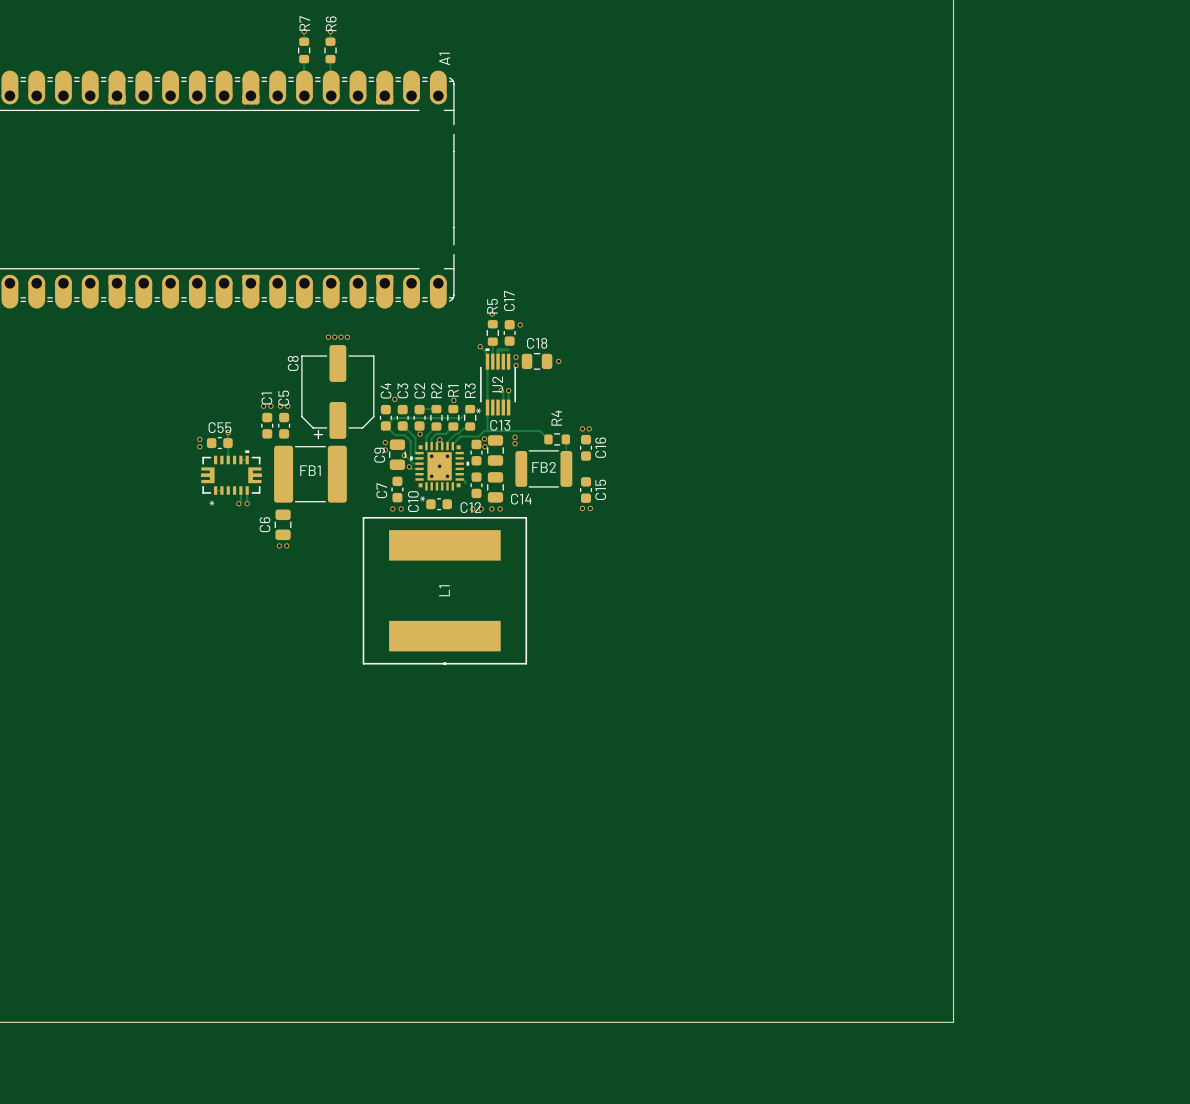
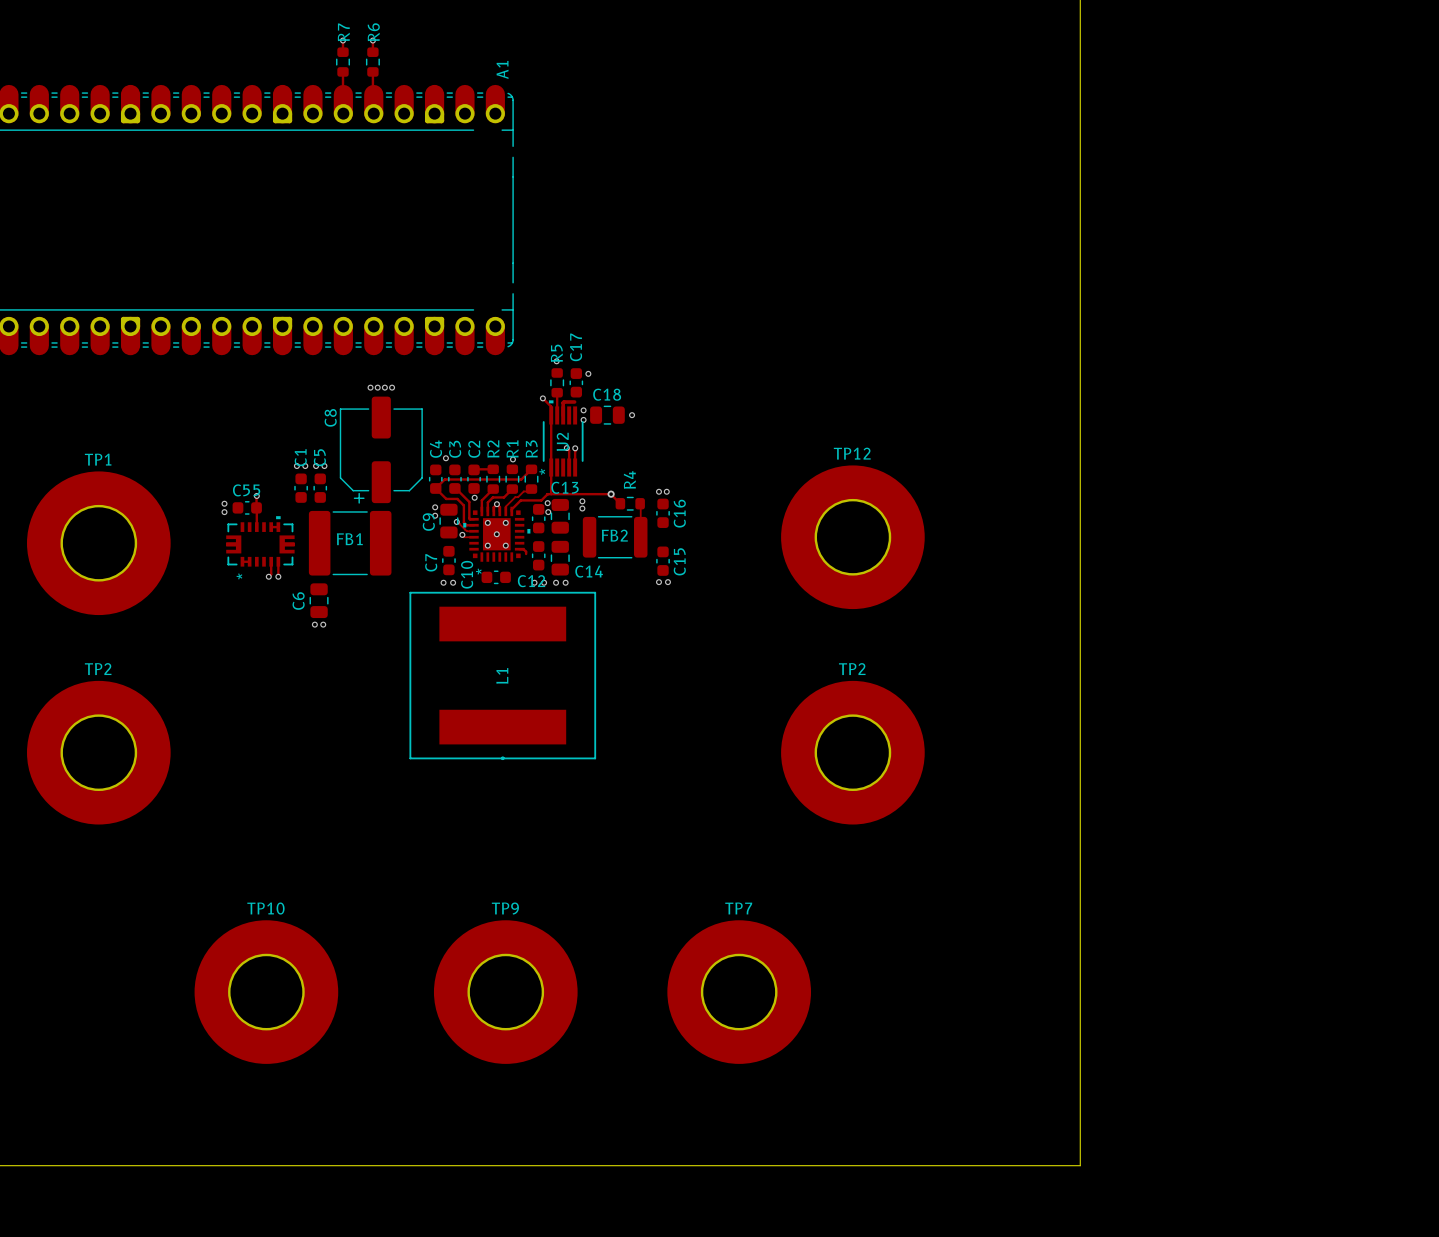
via: none -> (611, 494)
TP12: none -> (852, 537)
TP1: none -> (98, 543)
TP2: none -> (98, 752)
TP2: none -> (852, 752)
TP10: none -> (266, 992)
TP9: none -> (505, 992)
TP7: none -> (739, 992)

